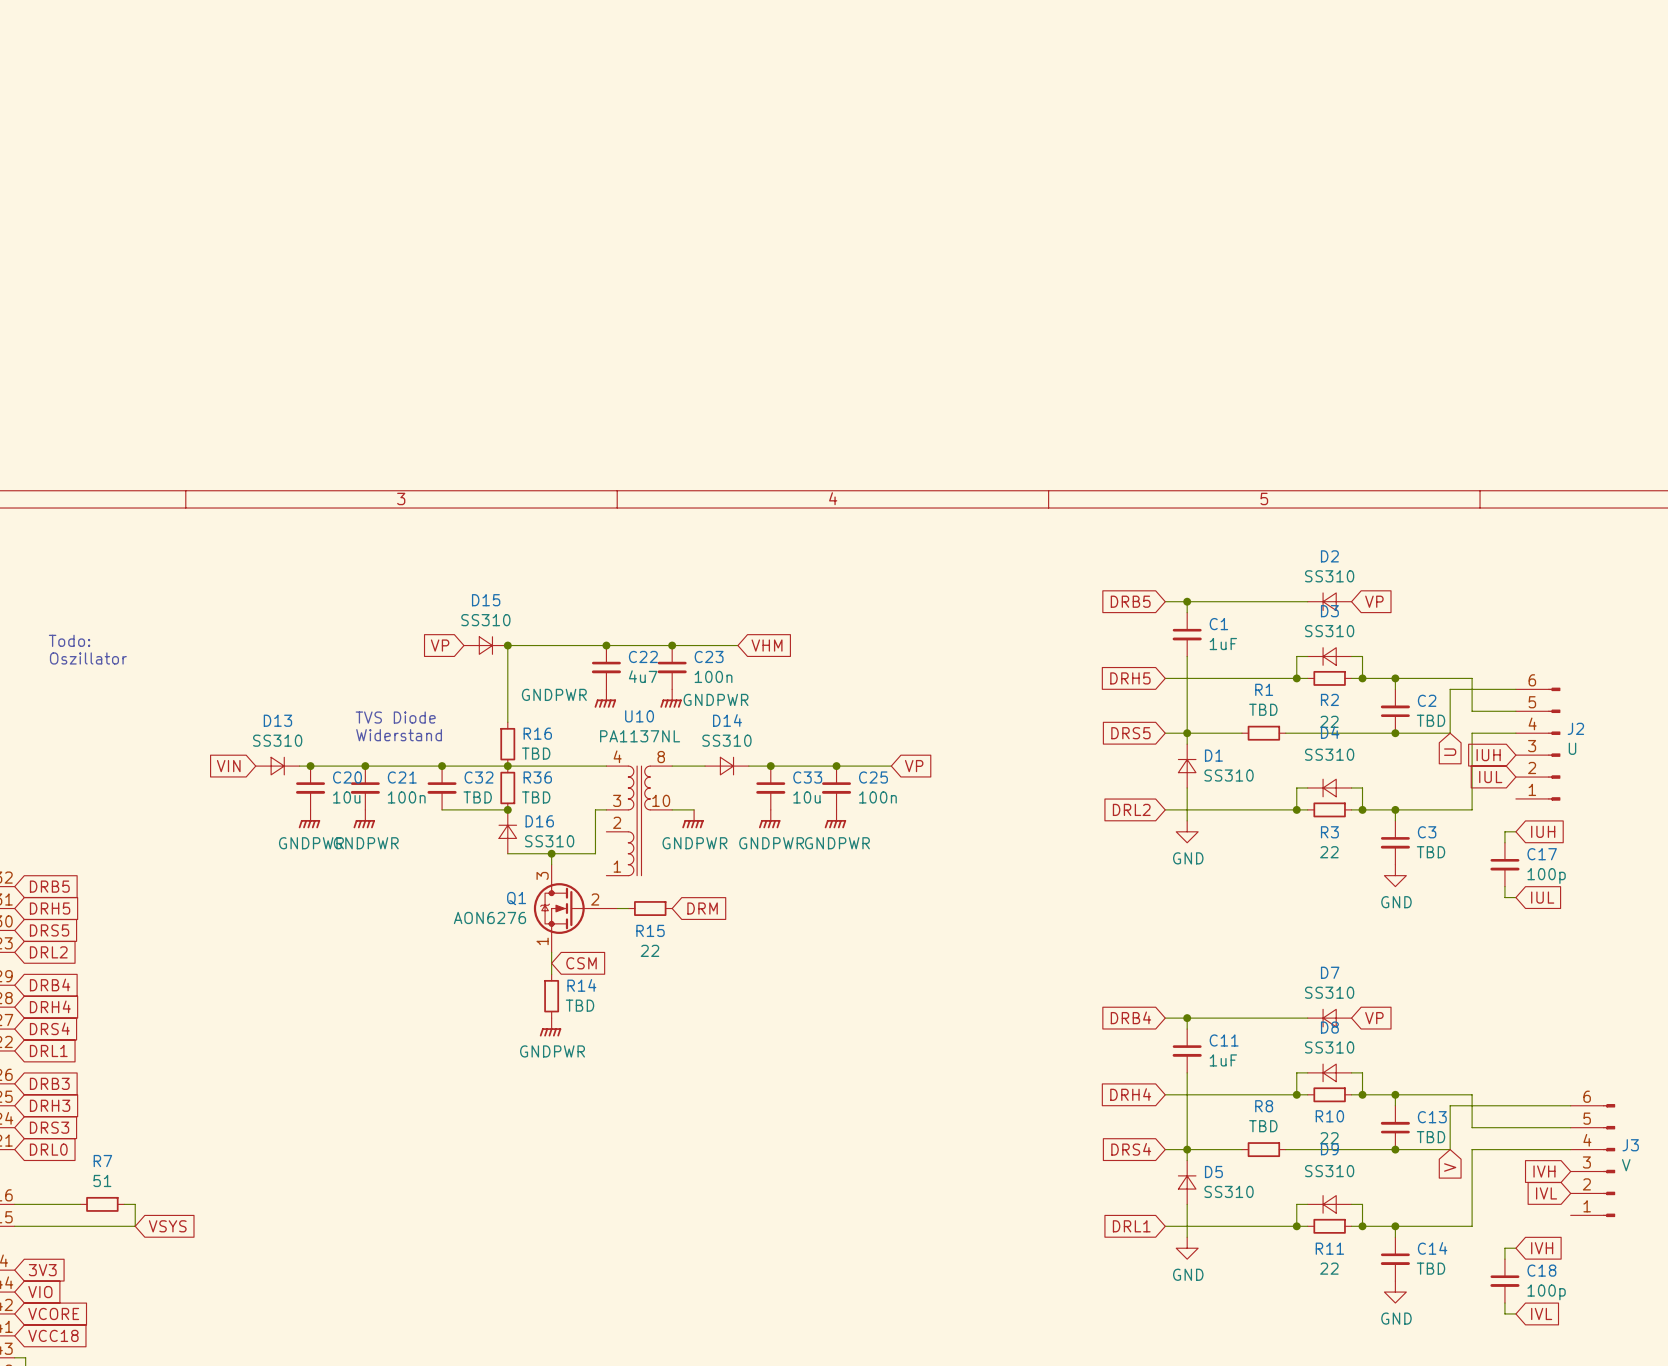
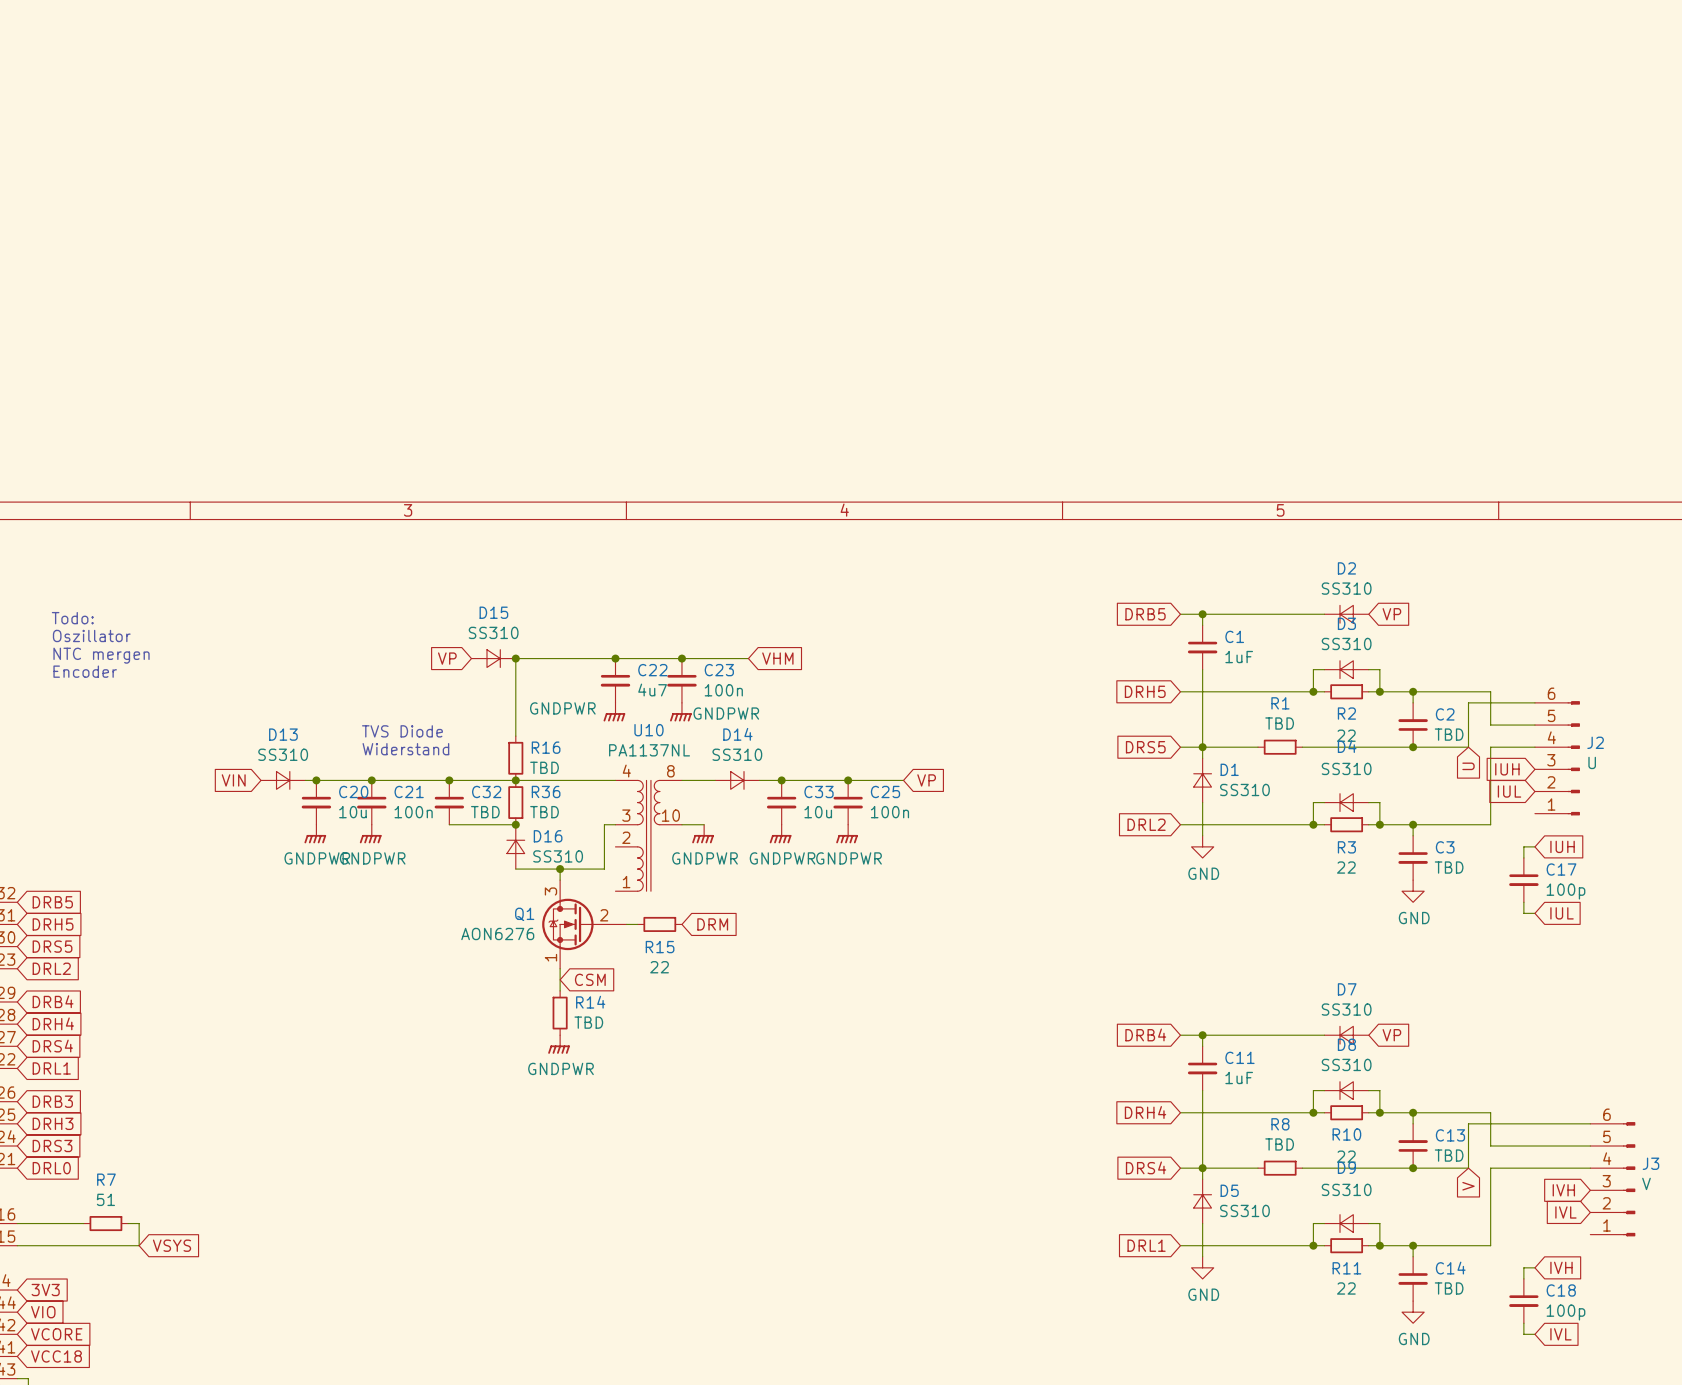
text: none -> Todo: (72, 618)
text: none -> Oszillator (91, 635)
text: Todo: (69, 640) -> NTC mergen (101, 655)
text: Oszillator (88, 658) -> Encoder (85, 671)

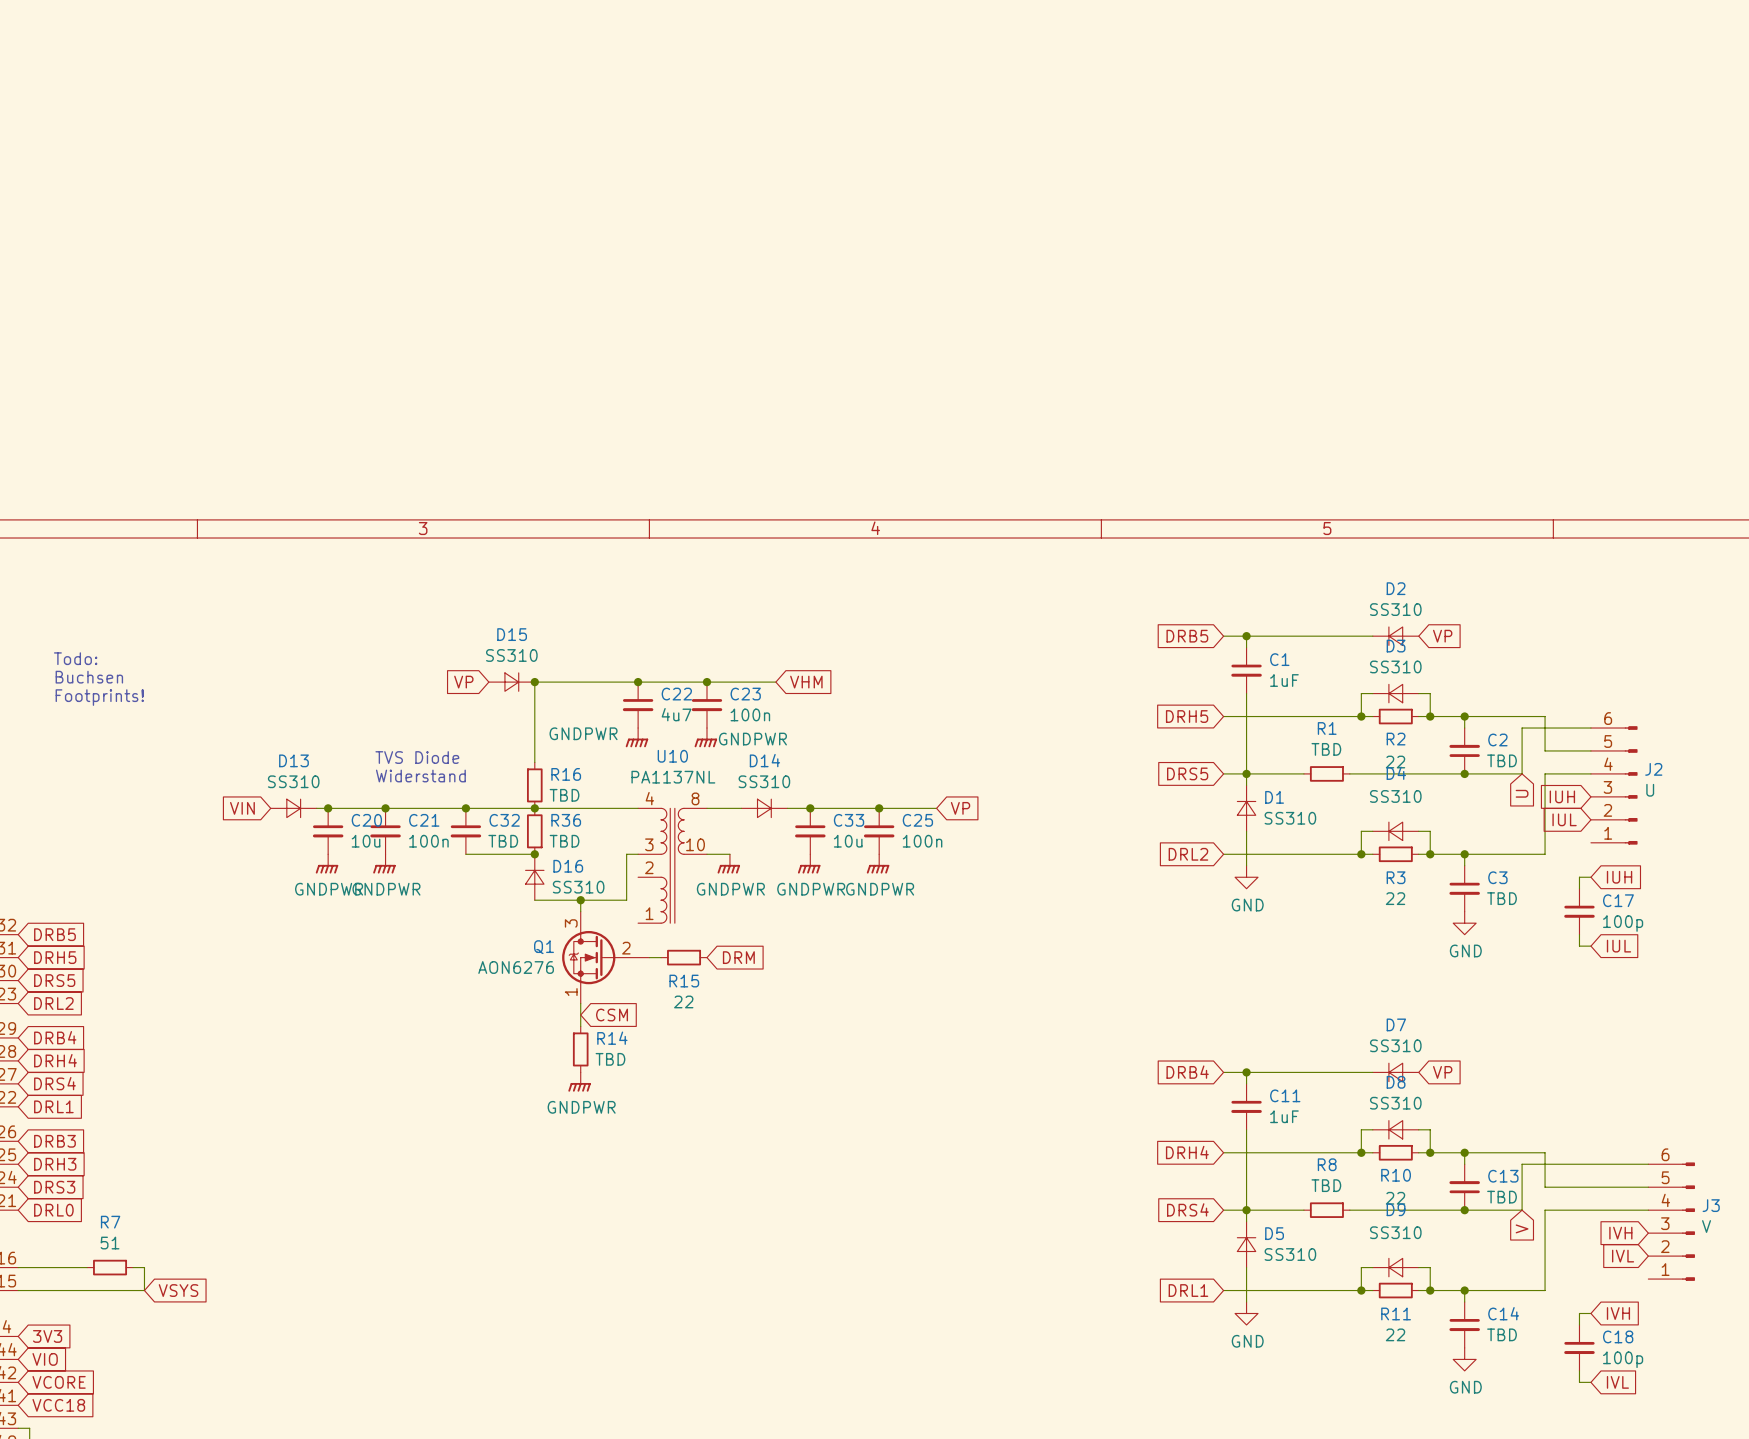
text: Todo: (72, 618) -> none
text: Oszillator (91, 635) -> Todo: (75, 658)
text: NTC mergen (101, 655) -> Buchsen (89, 677)
text: Encoder (85, 671) -> Footprints! (99, 697)

